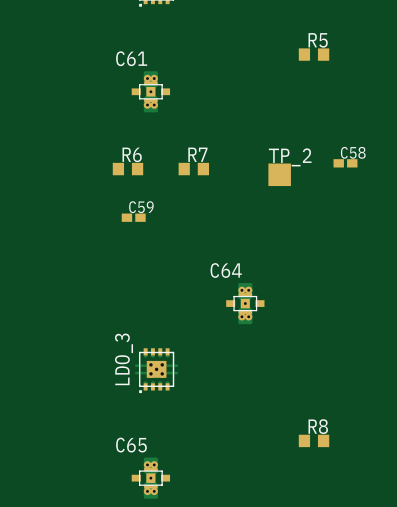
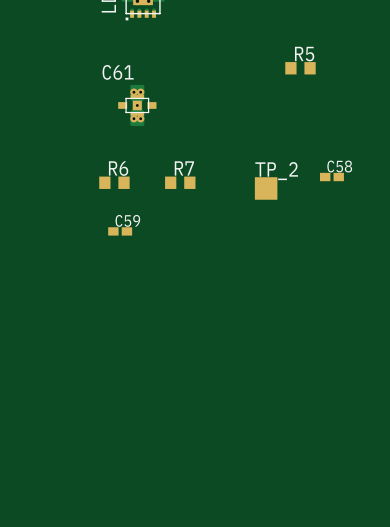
C64: (245, 303) -> none
LDO_3: (156, 370) -> none
R8: (314, 440) -> none
C65: (150, 478) -> none

